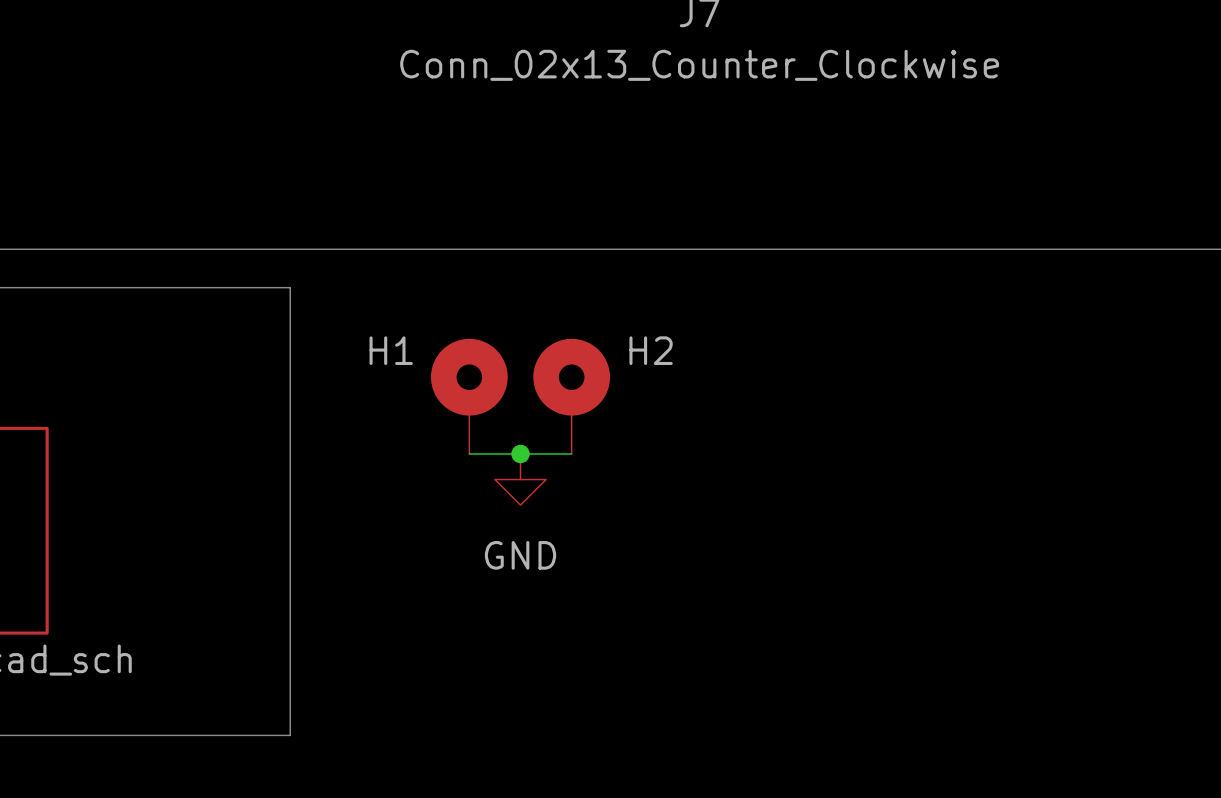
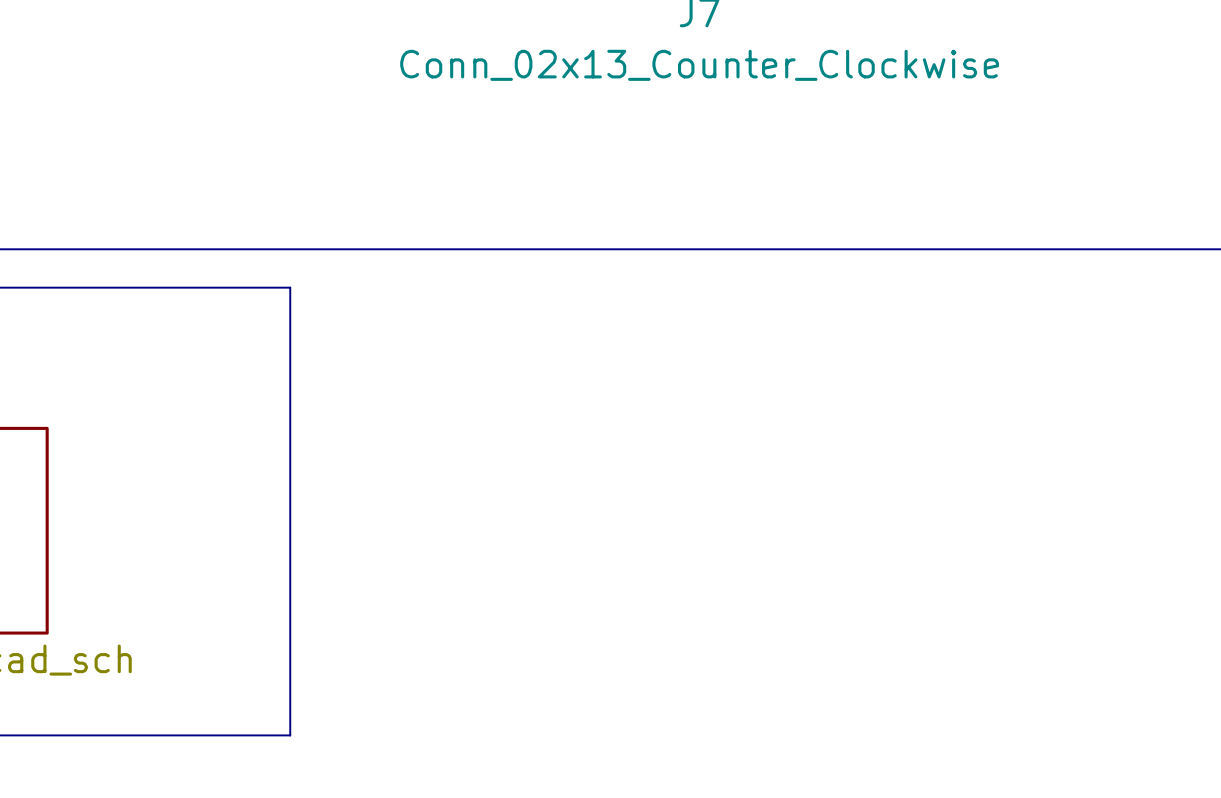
H1: (469, 396) -> none
H2: (571, 396) -> none
wire: (469, 453) (571, 453) -> none
junction: (520, 453) -> none
power symbol: GND (520, 479) -> none

